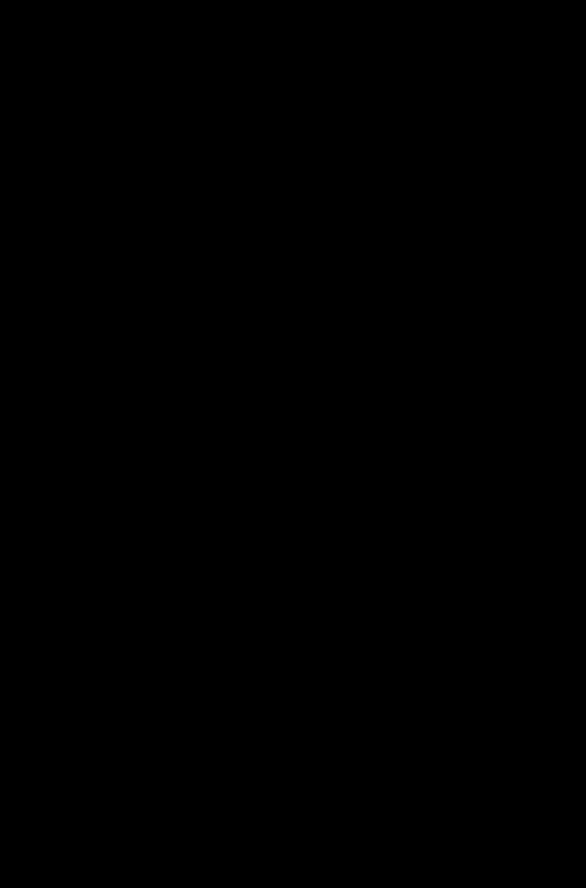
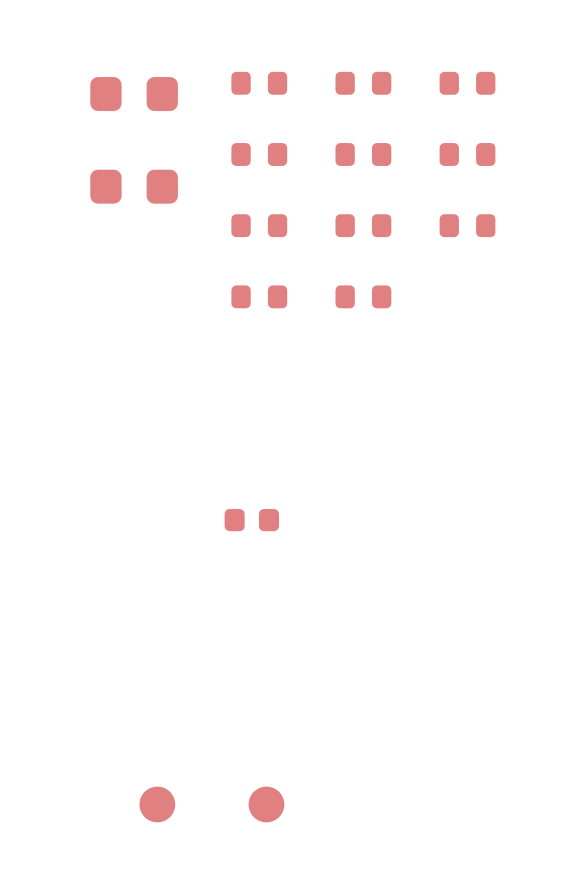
part: none -> (259, 83)
part: none -> (363, 83)
part: none -> (467, 83)
part: none -> (134, 94)
part: none -> (259, 154)
part: none -> (363, 154)
part: none -> (467, 154)
part: none -> (134, 186)
part: none -> (259, 225)
part: none -> (363, 225)
part: none -> (467, 225)
part: none -> (259, 296)
part: none -> (363, 296)
part: none -> (251, 520)
part: none -> (157, 804)
part: none -> (266, 804)

